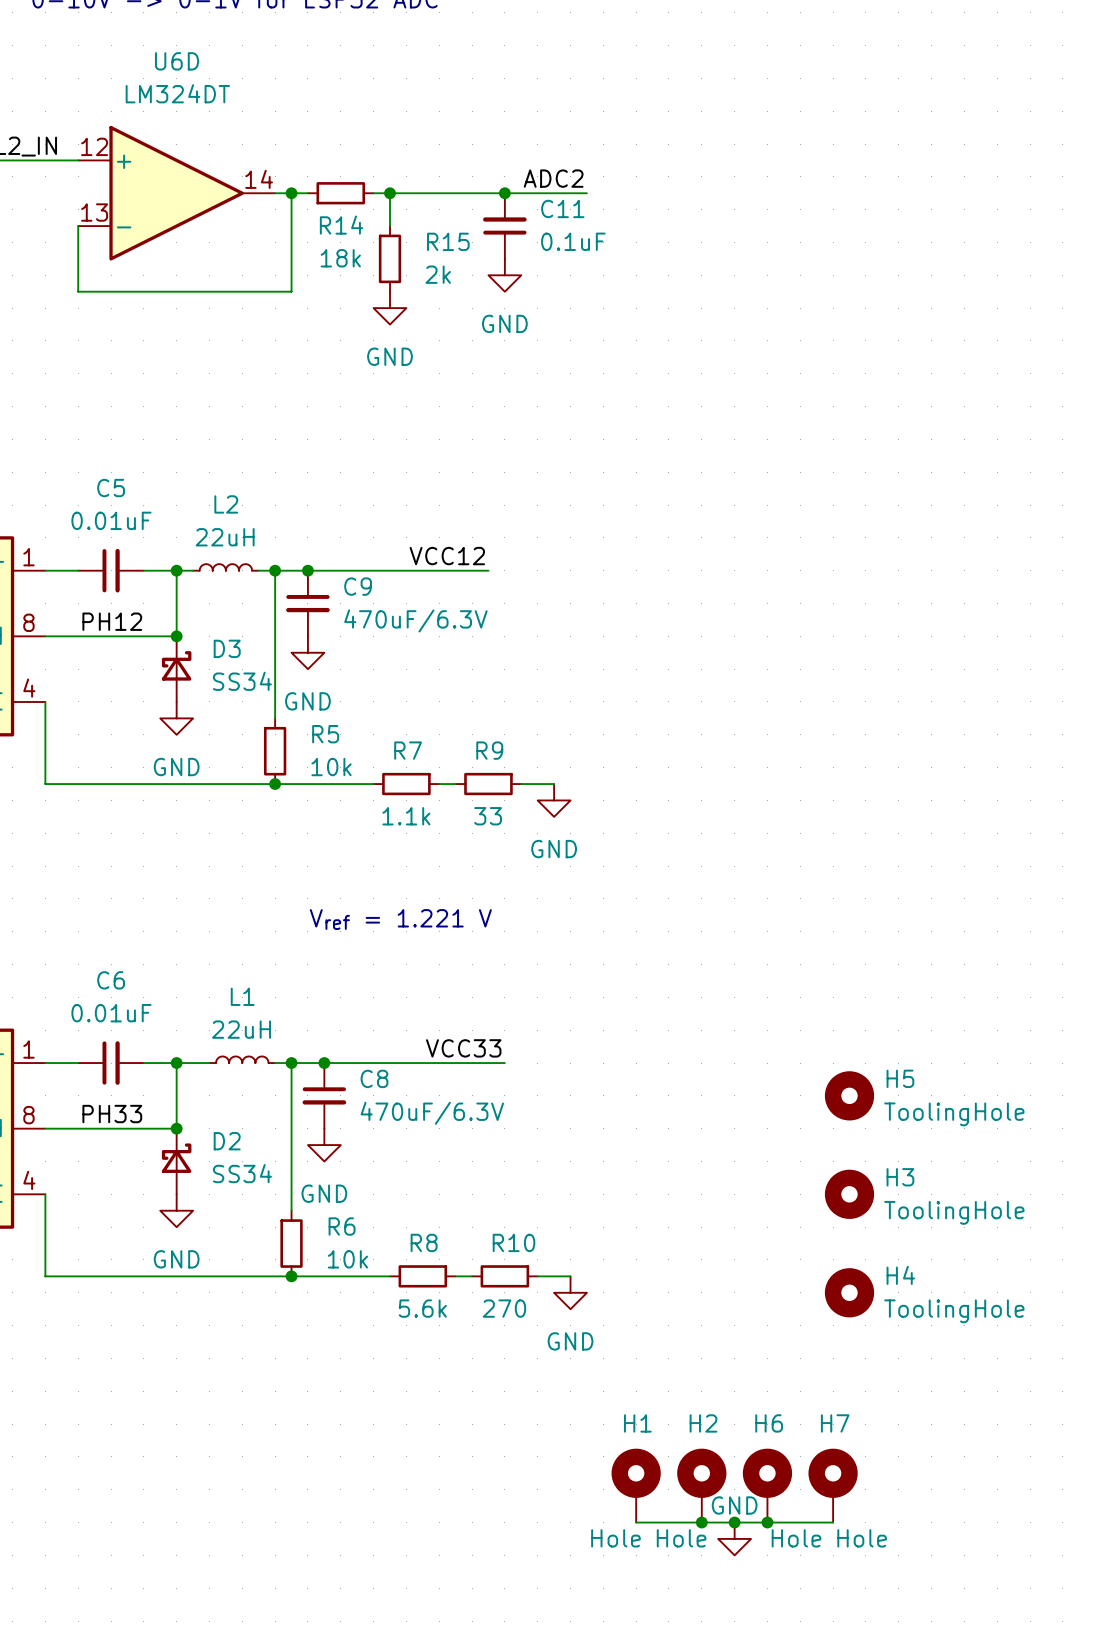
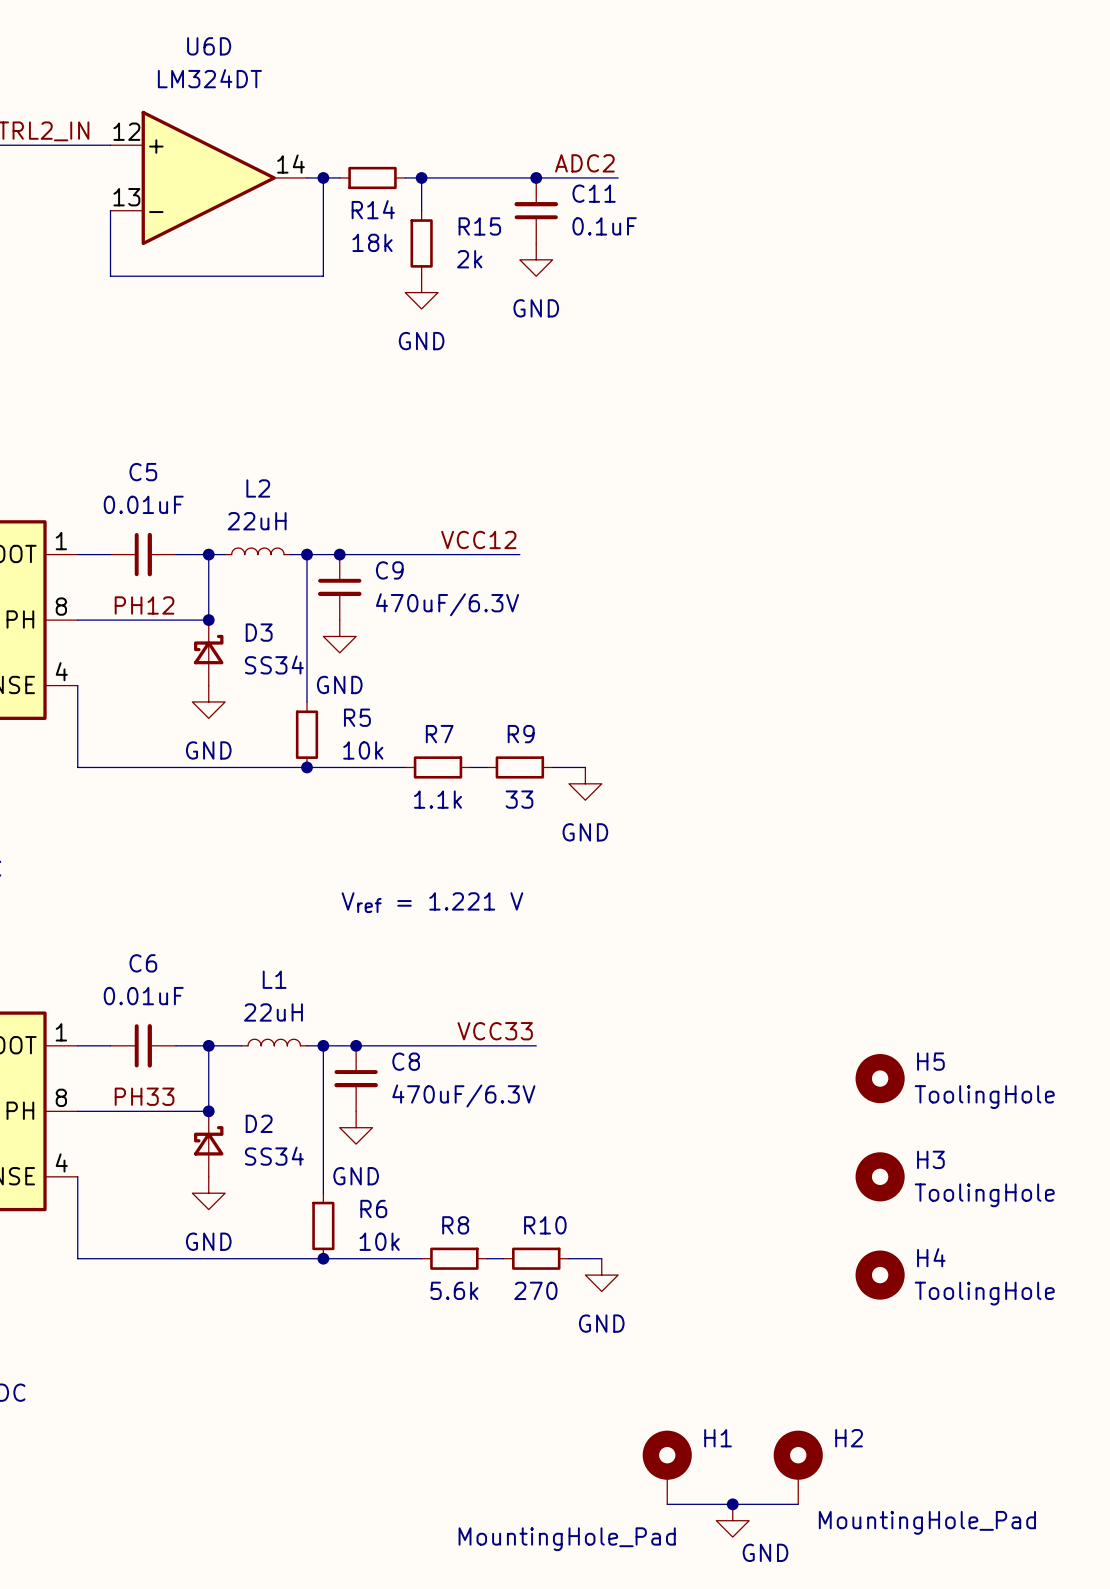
H1 name position: H1 (637, 1423) -> H1 (718, 1438)
H6 name: H6 (769, 1423) -> H2 (849, 1438)
H2: Hole (701, 1485) -> none
H7: Hole (833, 1485) -> none
power symbol text position: GND (734, 1505) -> GND (765, 1552)
junction: (734, 1522) -> none
wire: (767, 1522) (833, 1522) -> none
junction: (767, 1522) -> none
H1 value: Hole (615, 1538) -> MountingHole_Pad (567, 1539)
H6 value: Hole (681, 1538) -> MountingHole_Pad (927, 1522)
power symbol position: GND (734, 1538) -> GND (732, 1520)

